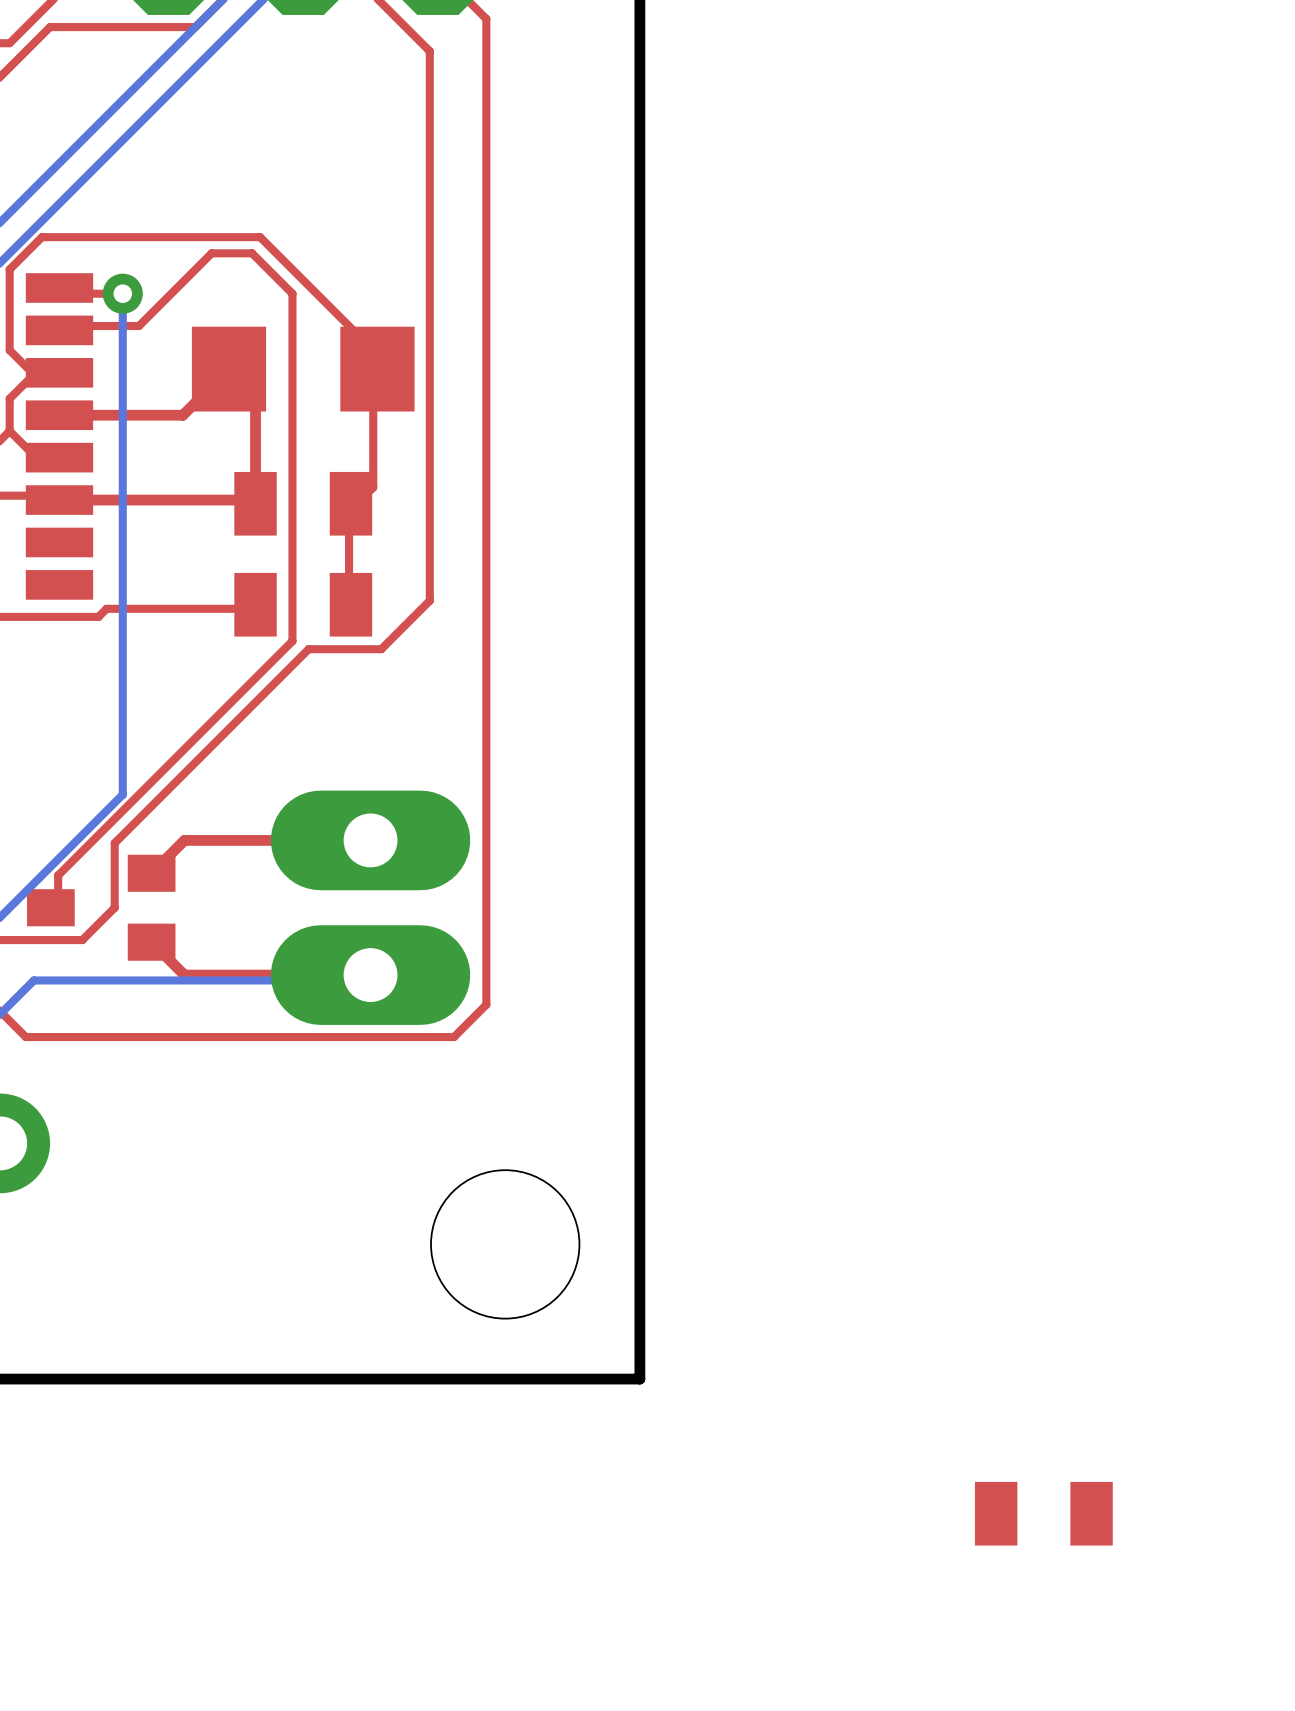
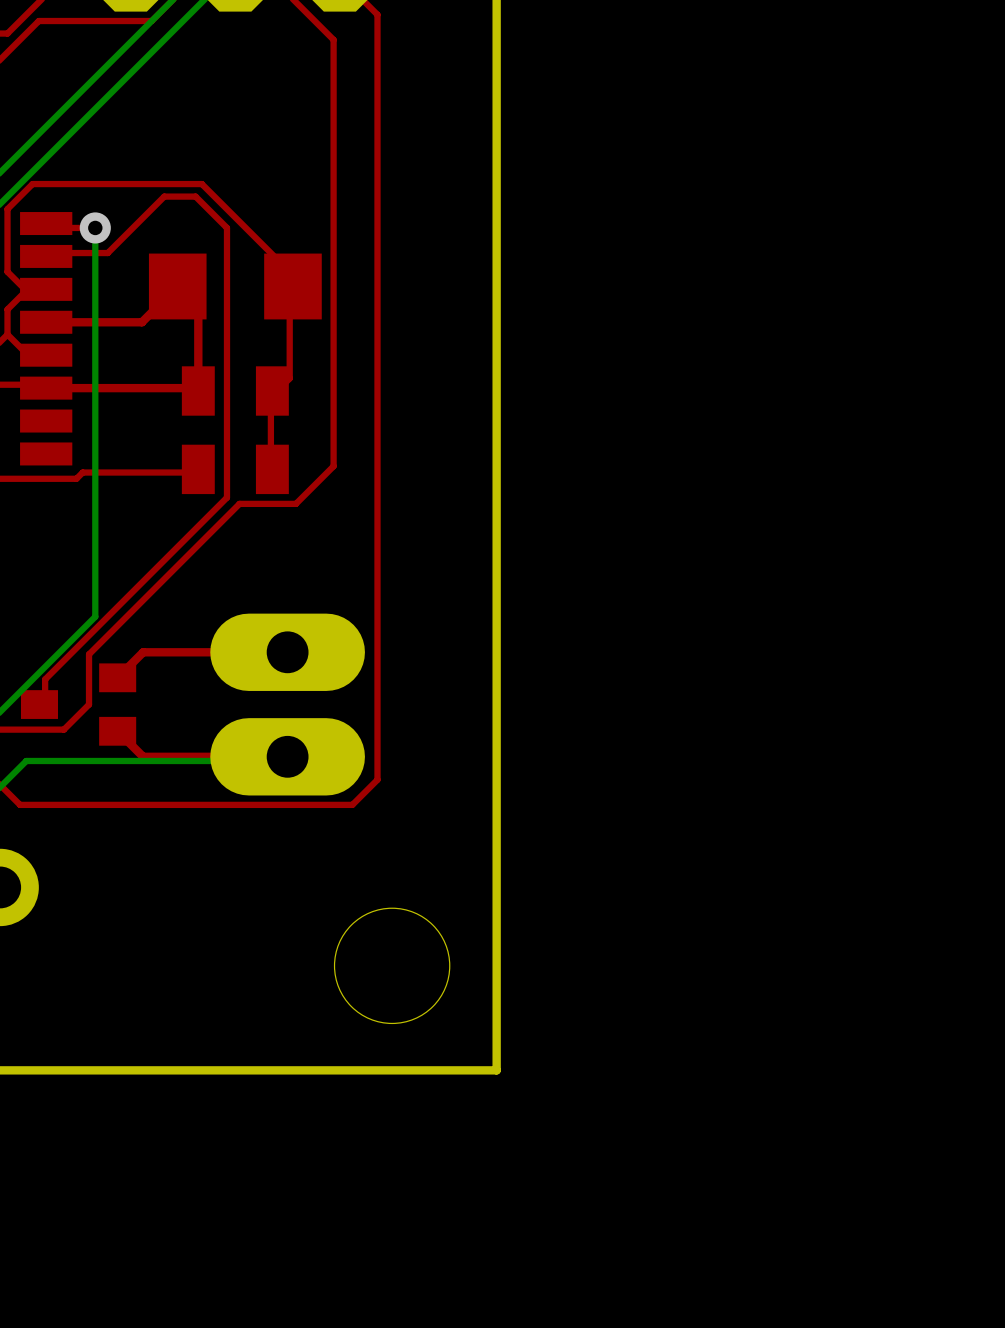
part: (1043, 1513) -> none

